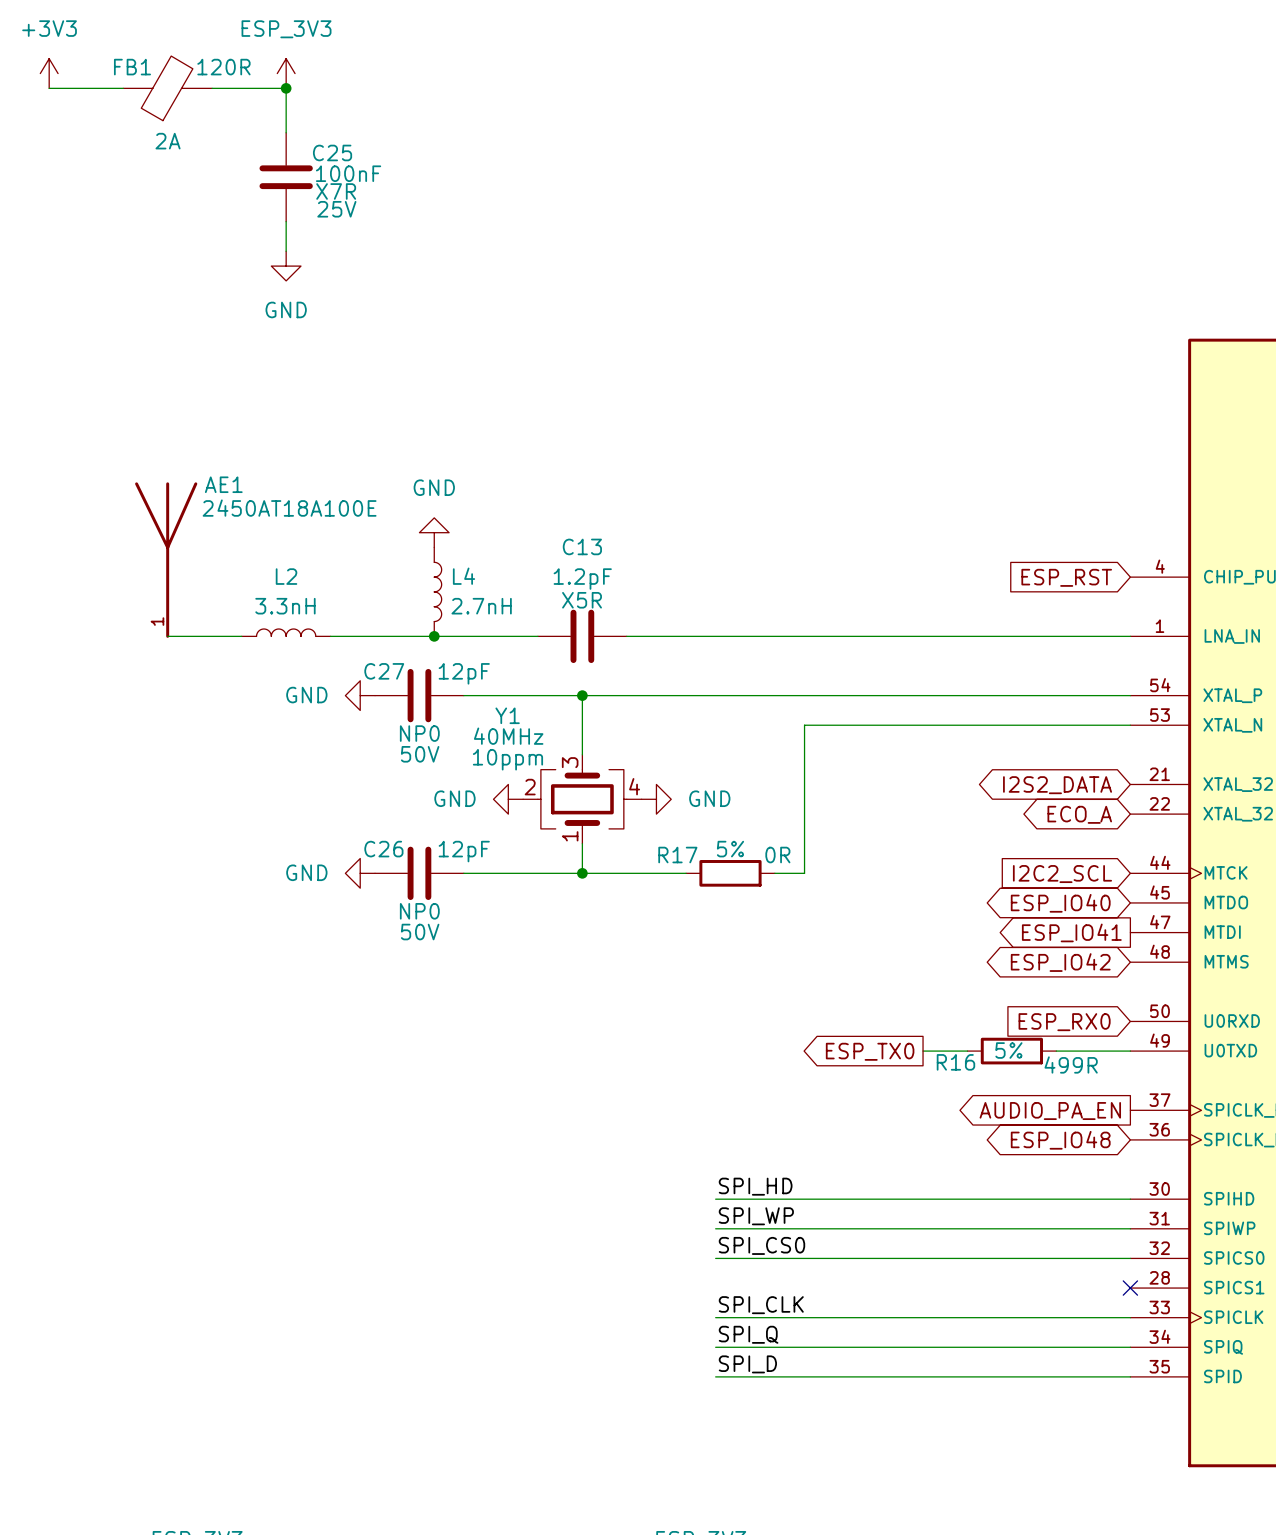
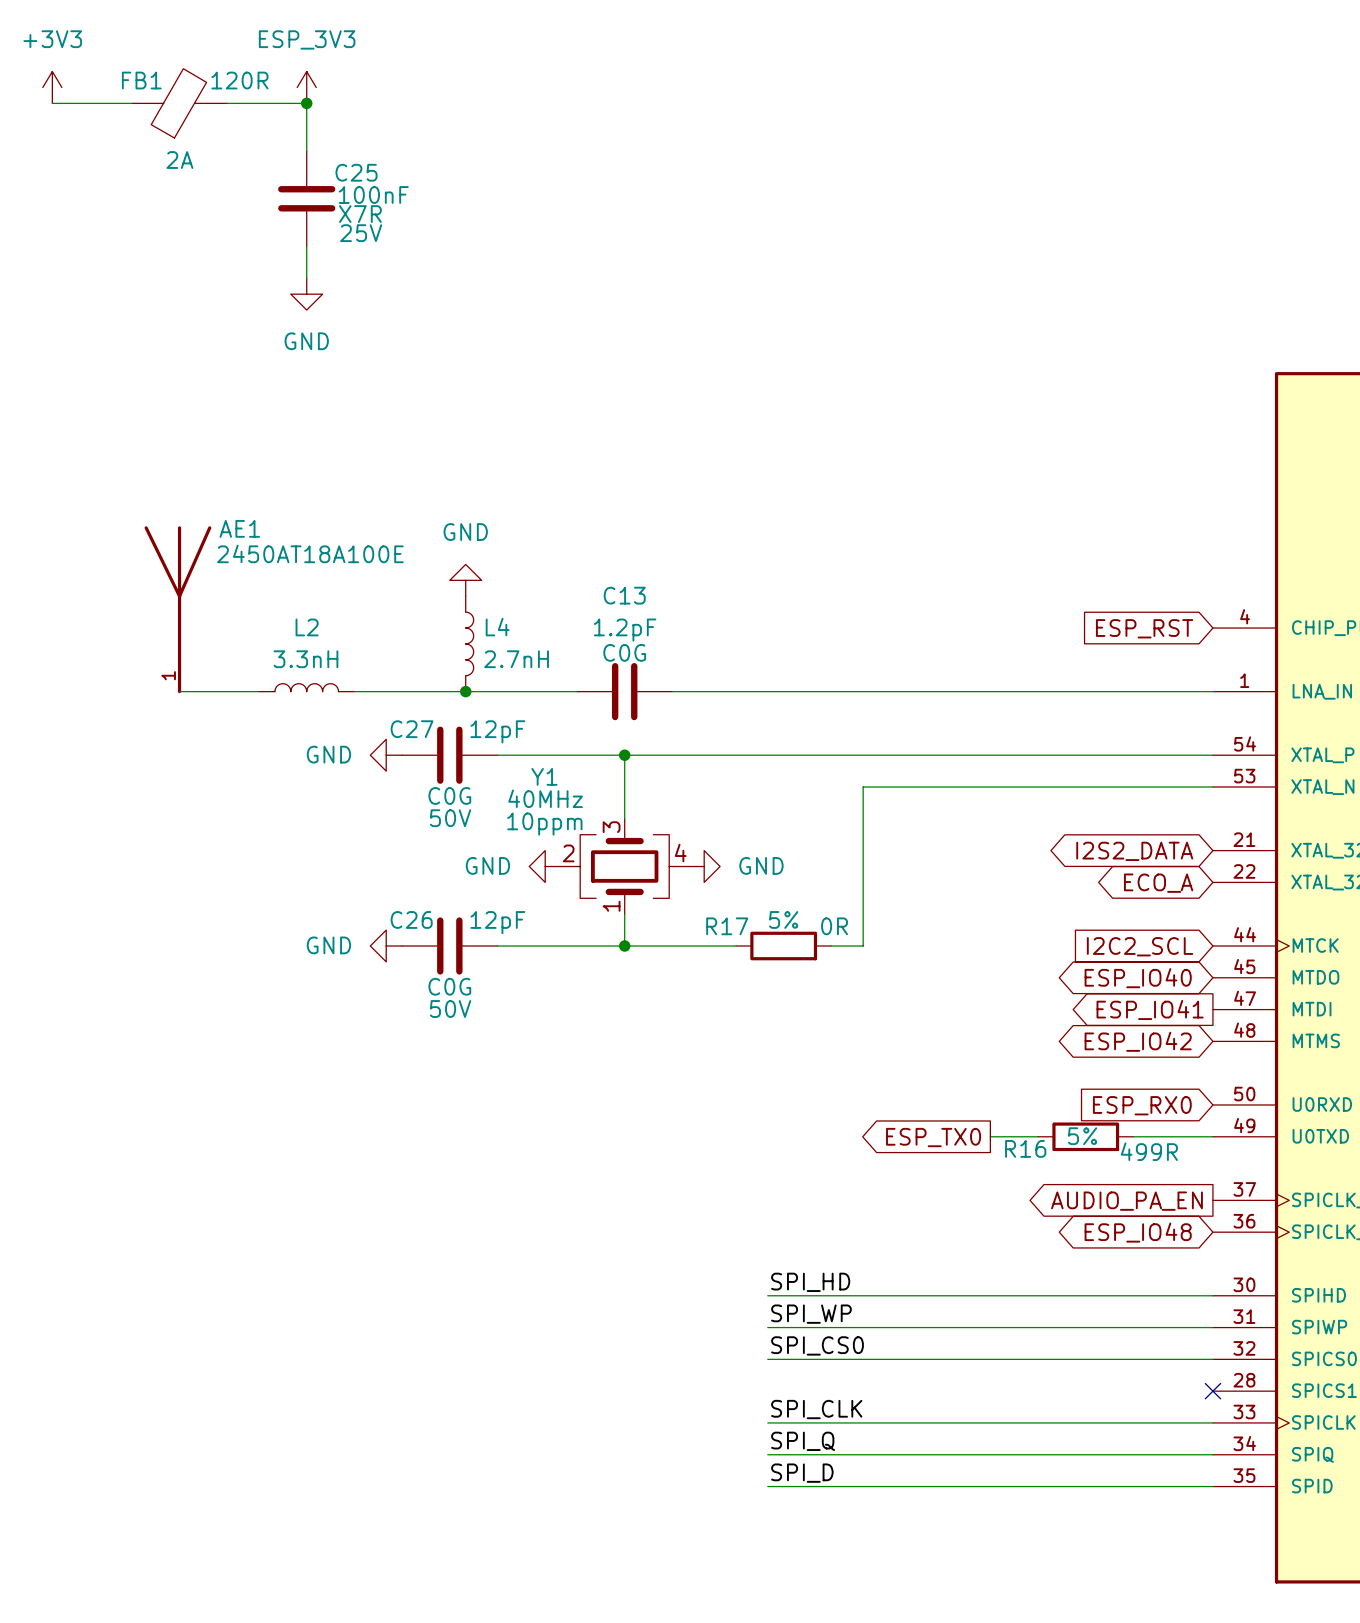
C13 text: X5R (582, 600) -> C0G (624, 652)
C27 text: NP0 (419, 733) -> C0G (449, 795)
C26 text: NP0 (419, 911) -> C0G (449, 986)

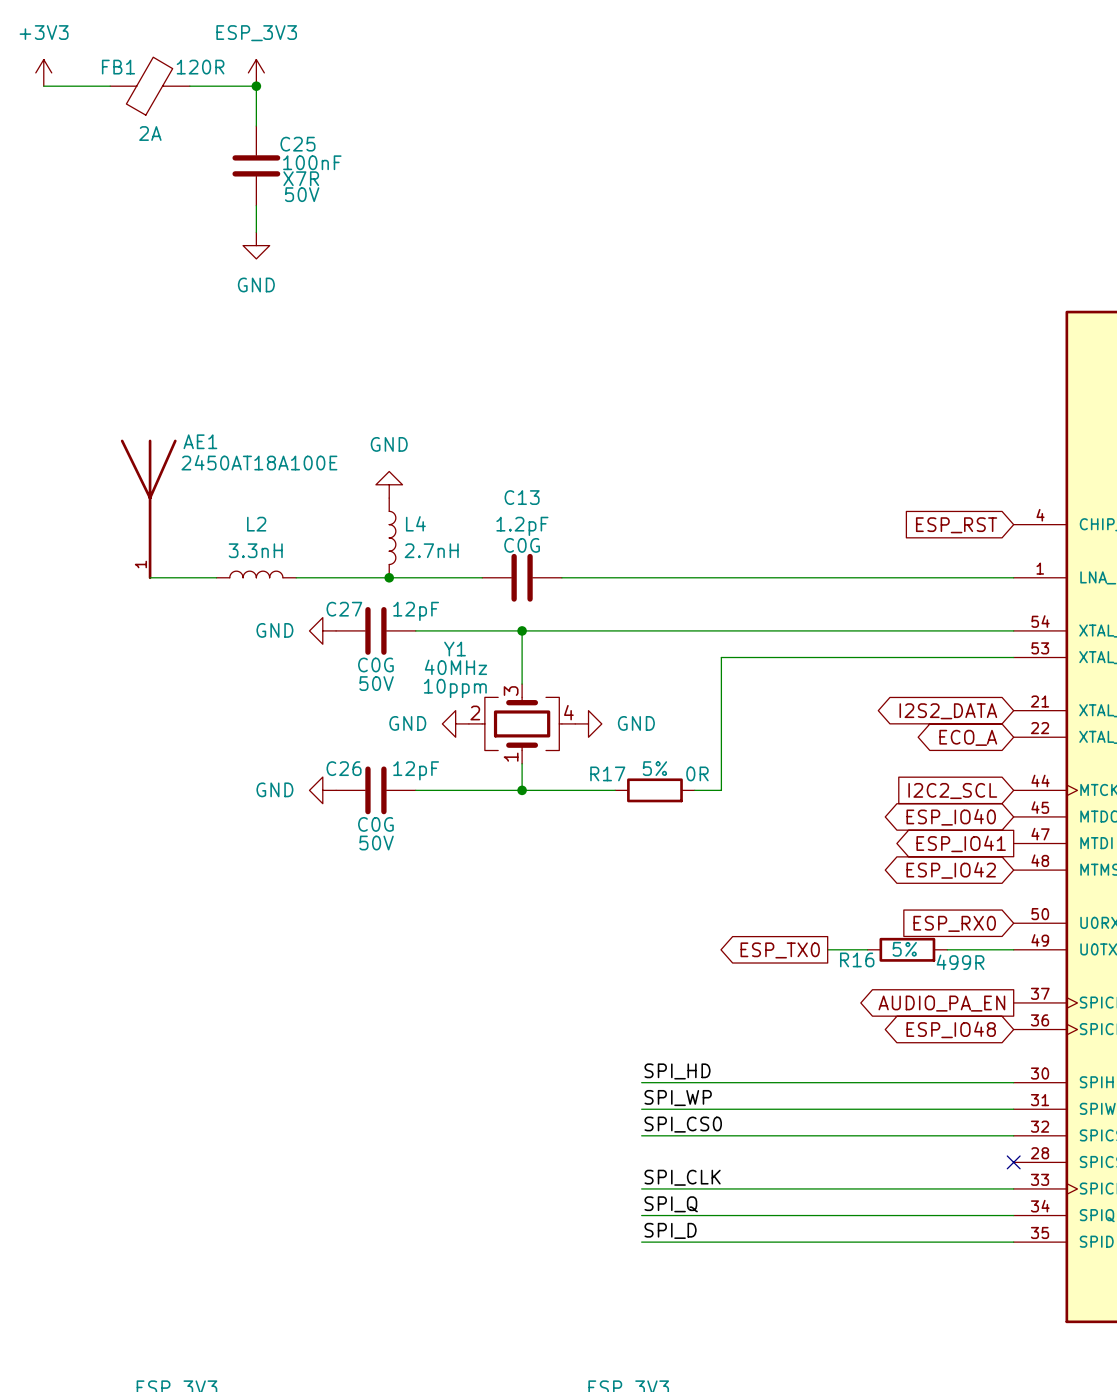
C25 text: 25V (361, 233) -> 50V (302, 194)

